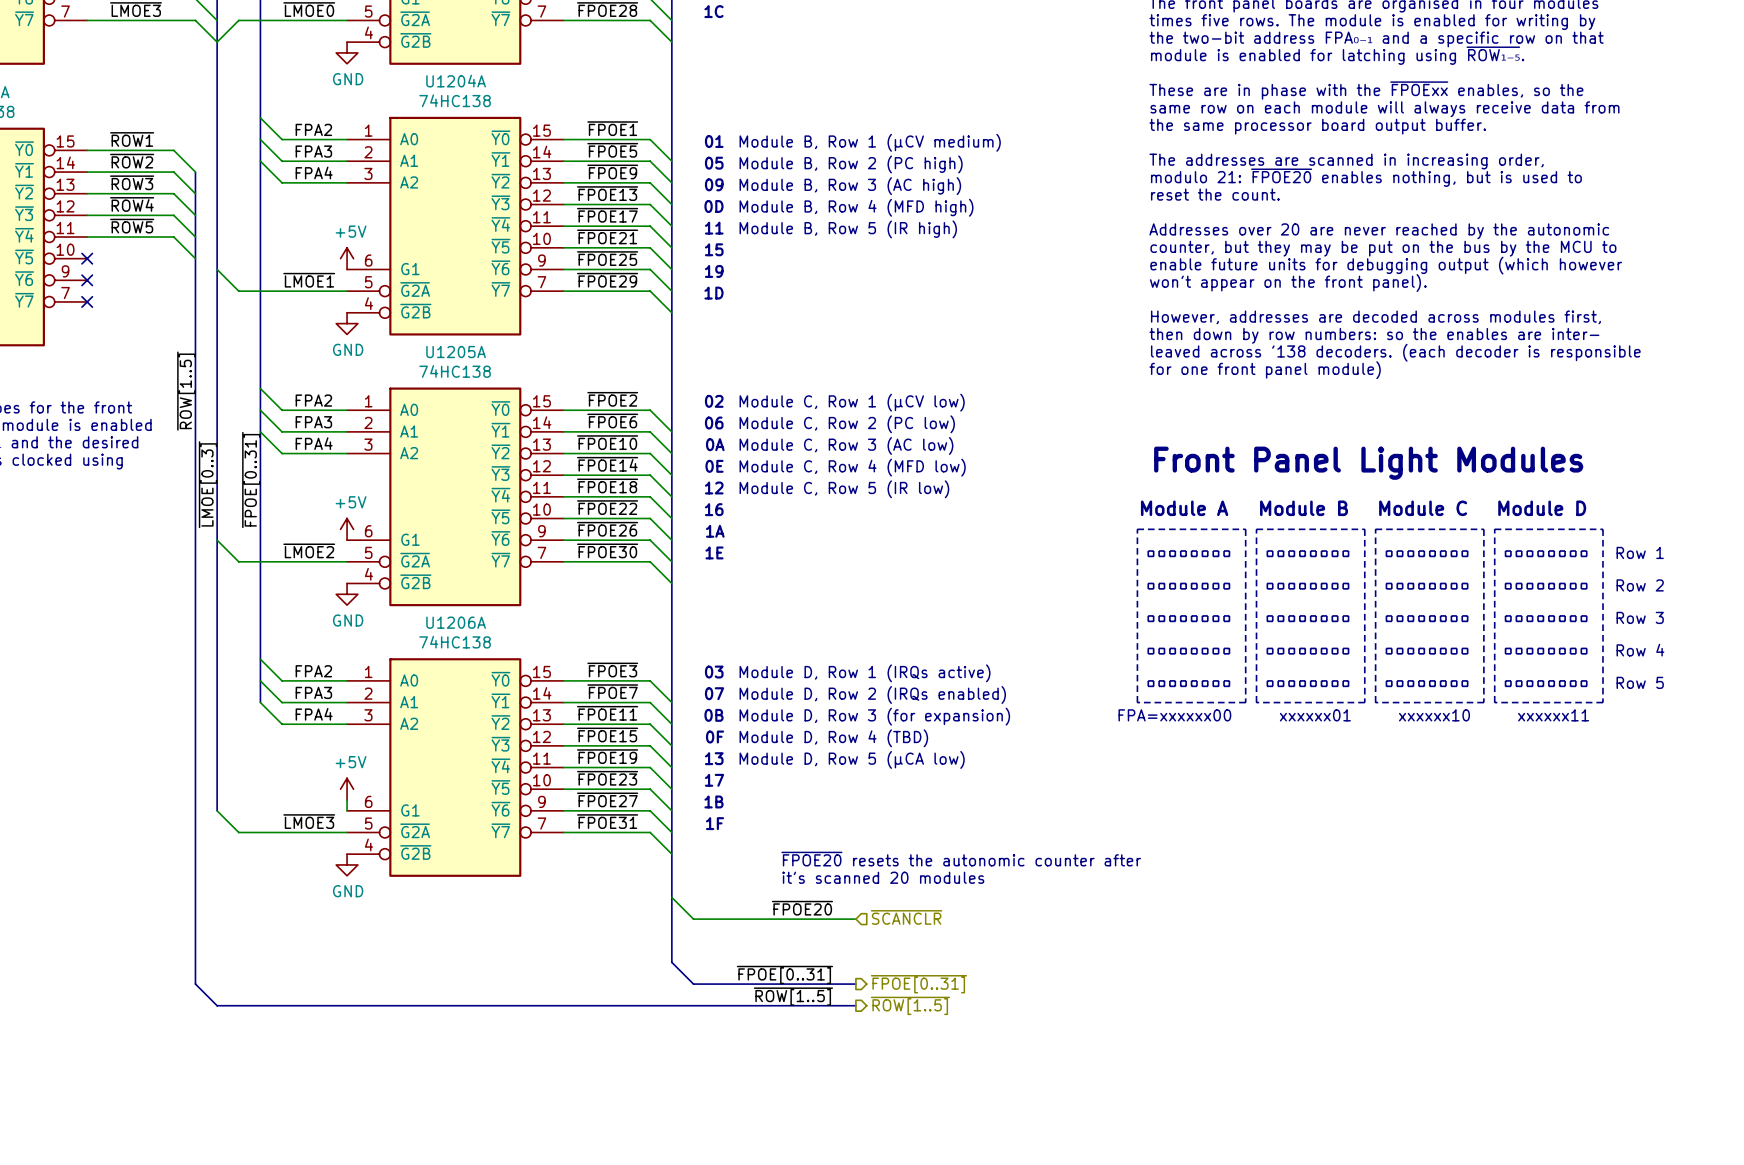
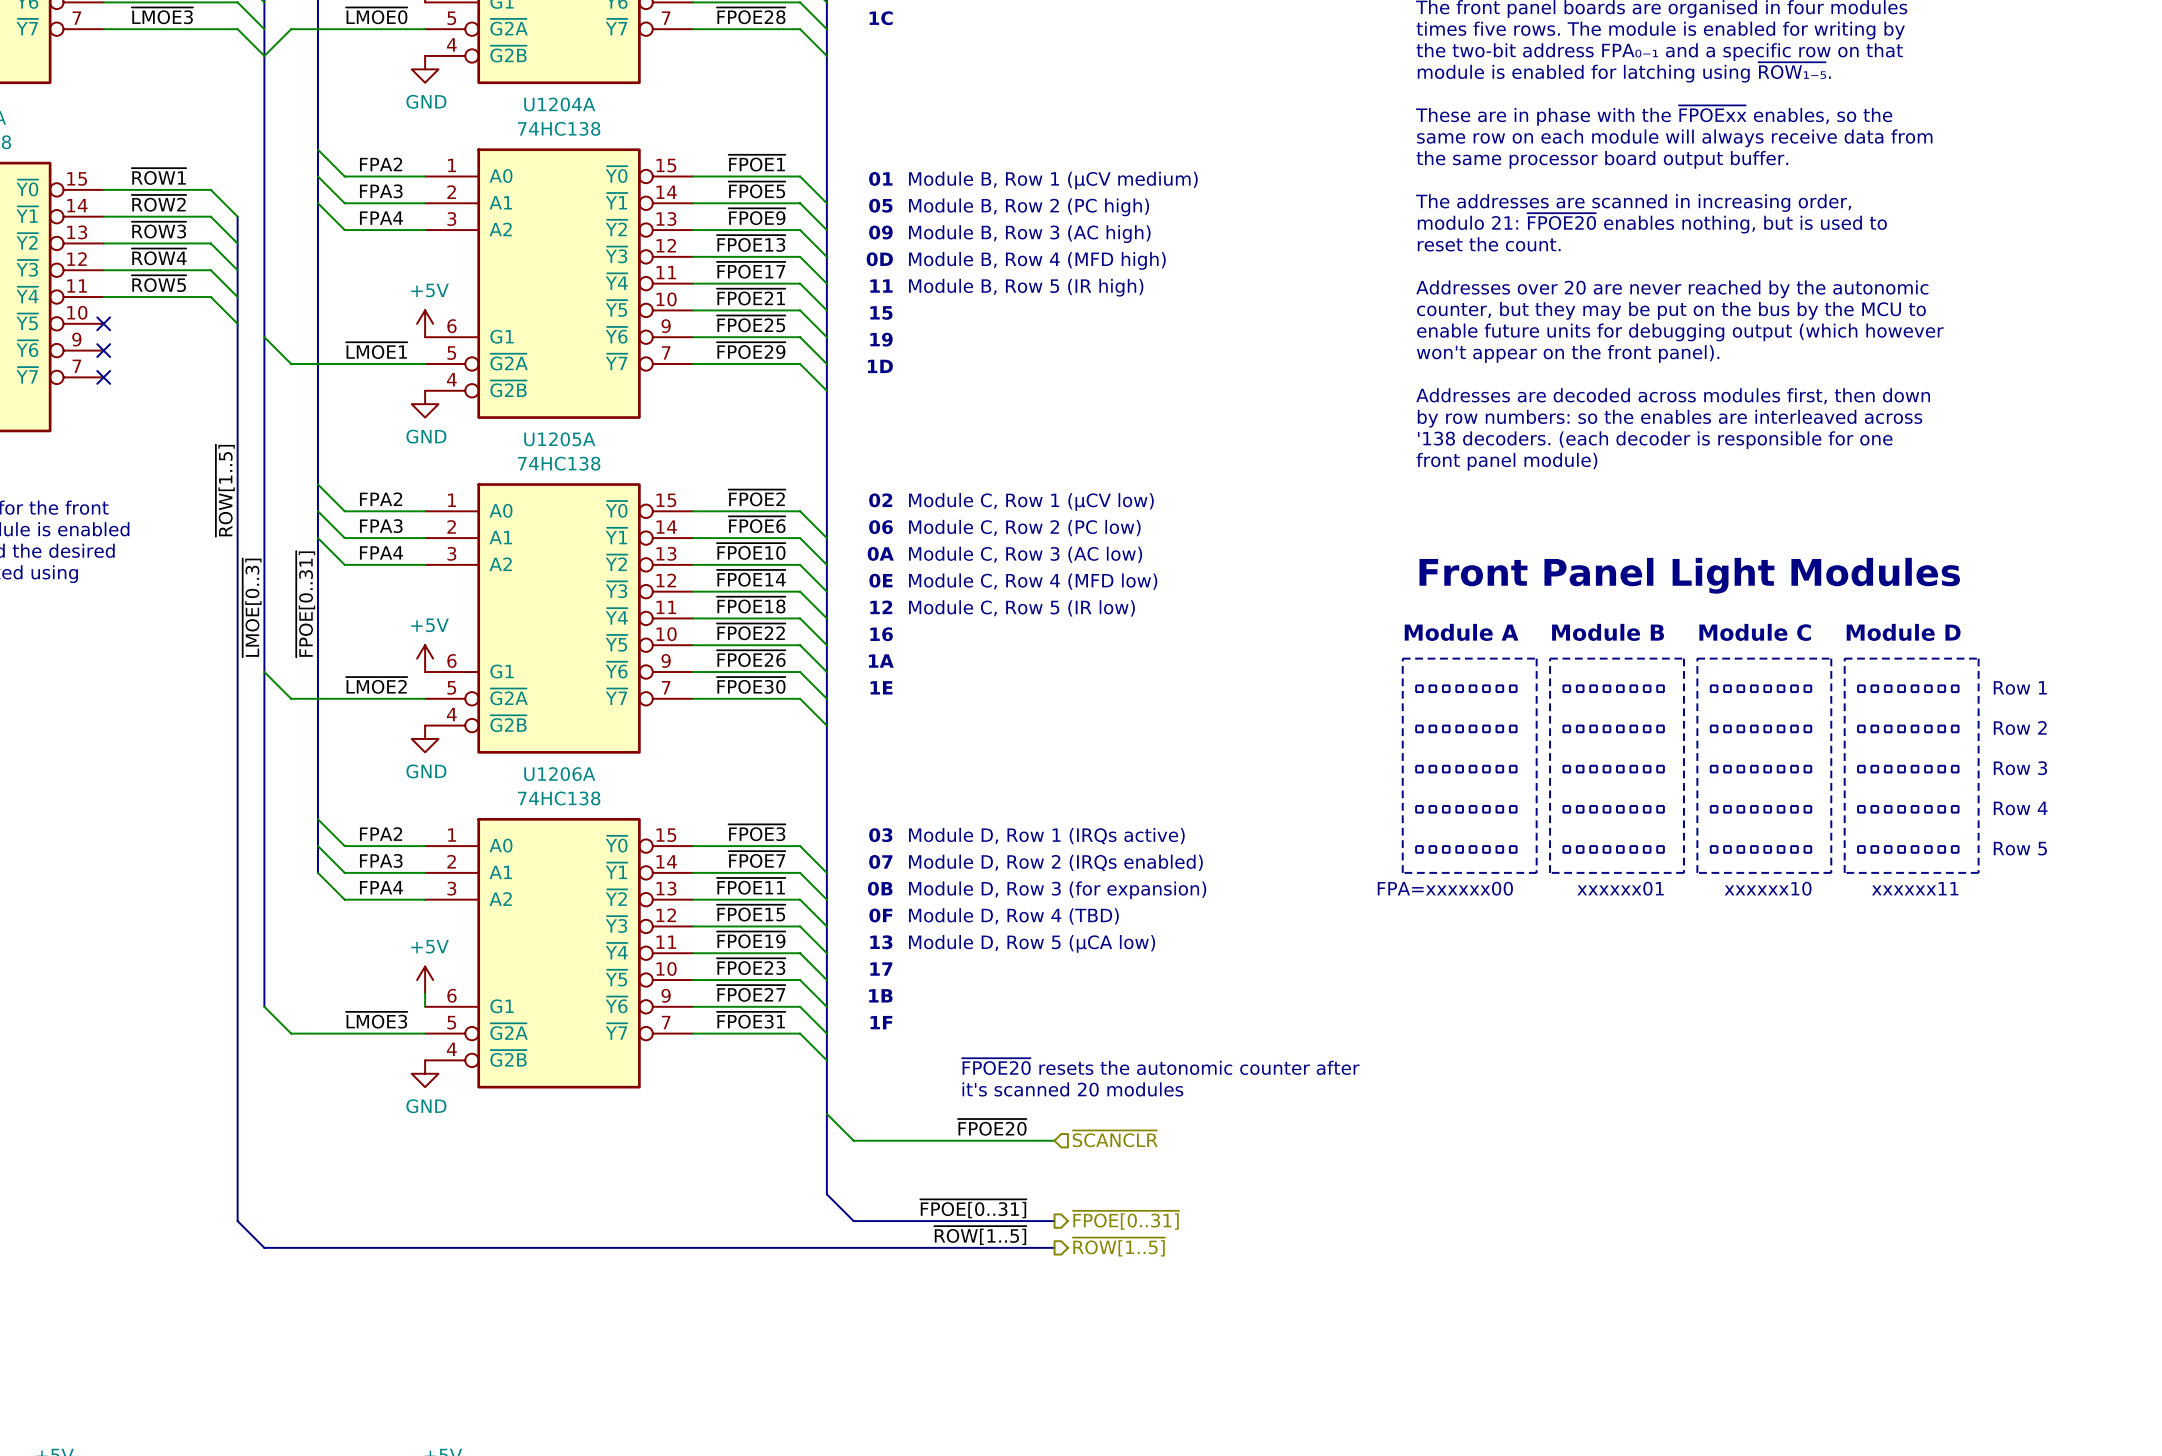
text: However, addresses are decoded across modules first, (1375, 317) -> Addresses are decoded across modules first, then down (1673, 396)
text: then down by row numbers: so the enables are inter- (1374, 335) -> by row numbers: so the enables are interleaved across (1670, 418)
text: leaved across '138 decoders. (each decoder is responsible (1395, 352) -> '138 decoders. (each decoder is responsible for one (1655, 440)
text: for one front panel module) (1265, 370) -> front panel module) (1506, 461)

